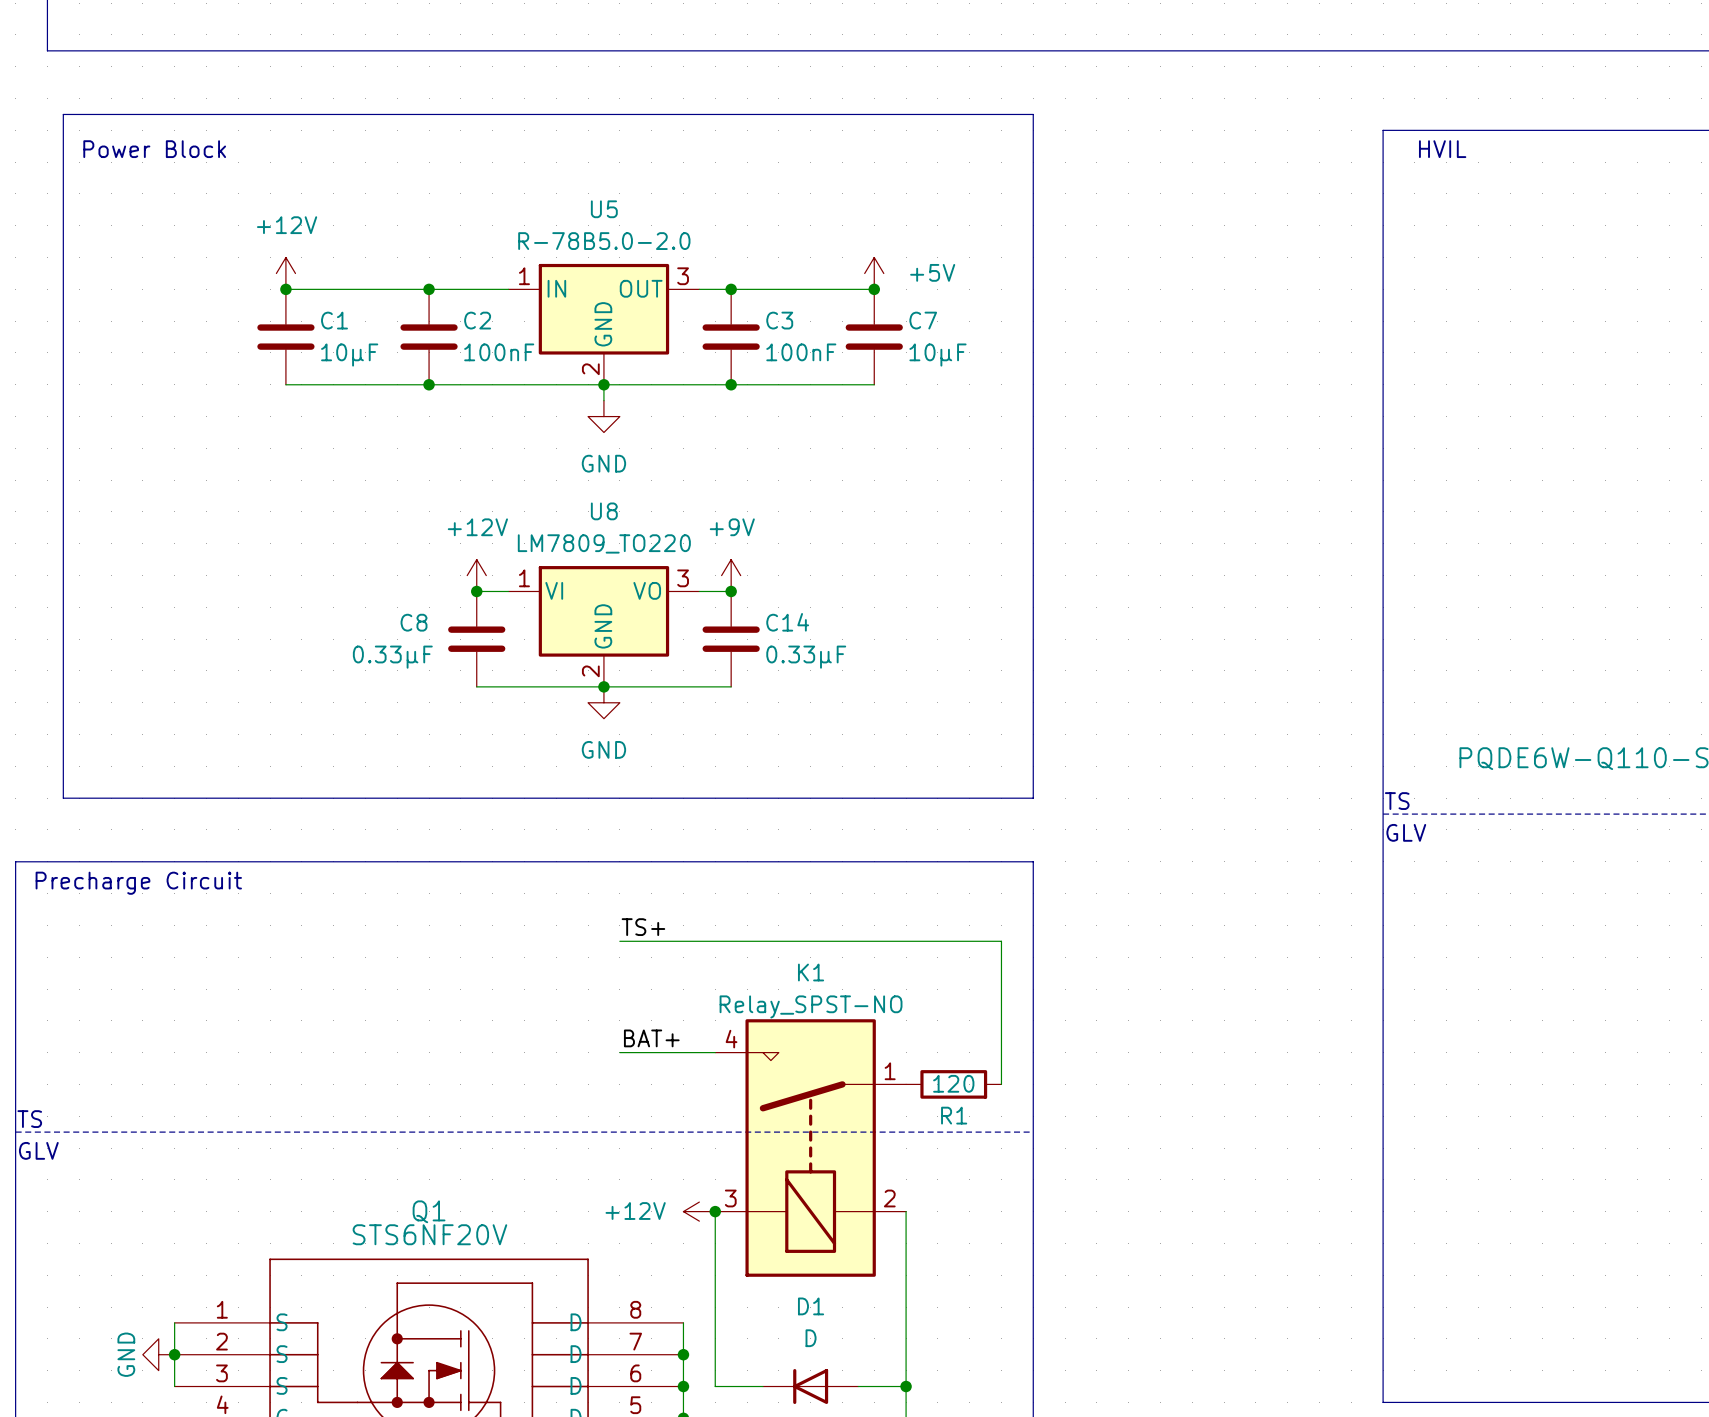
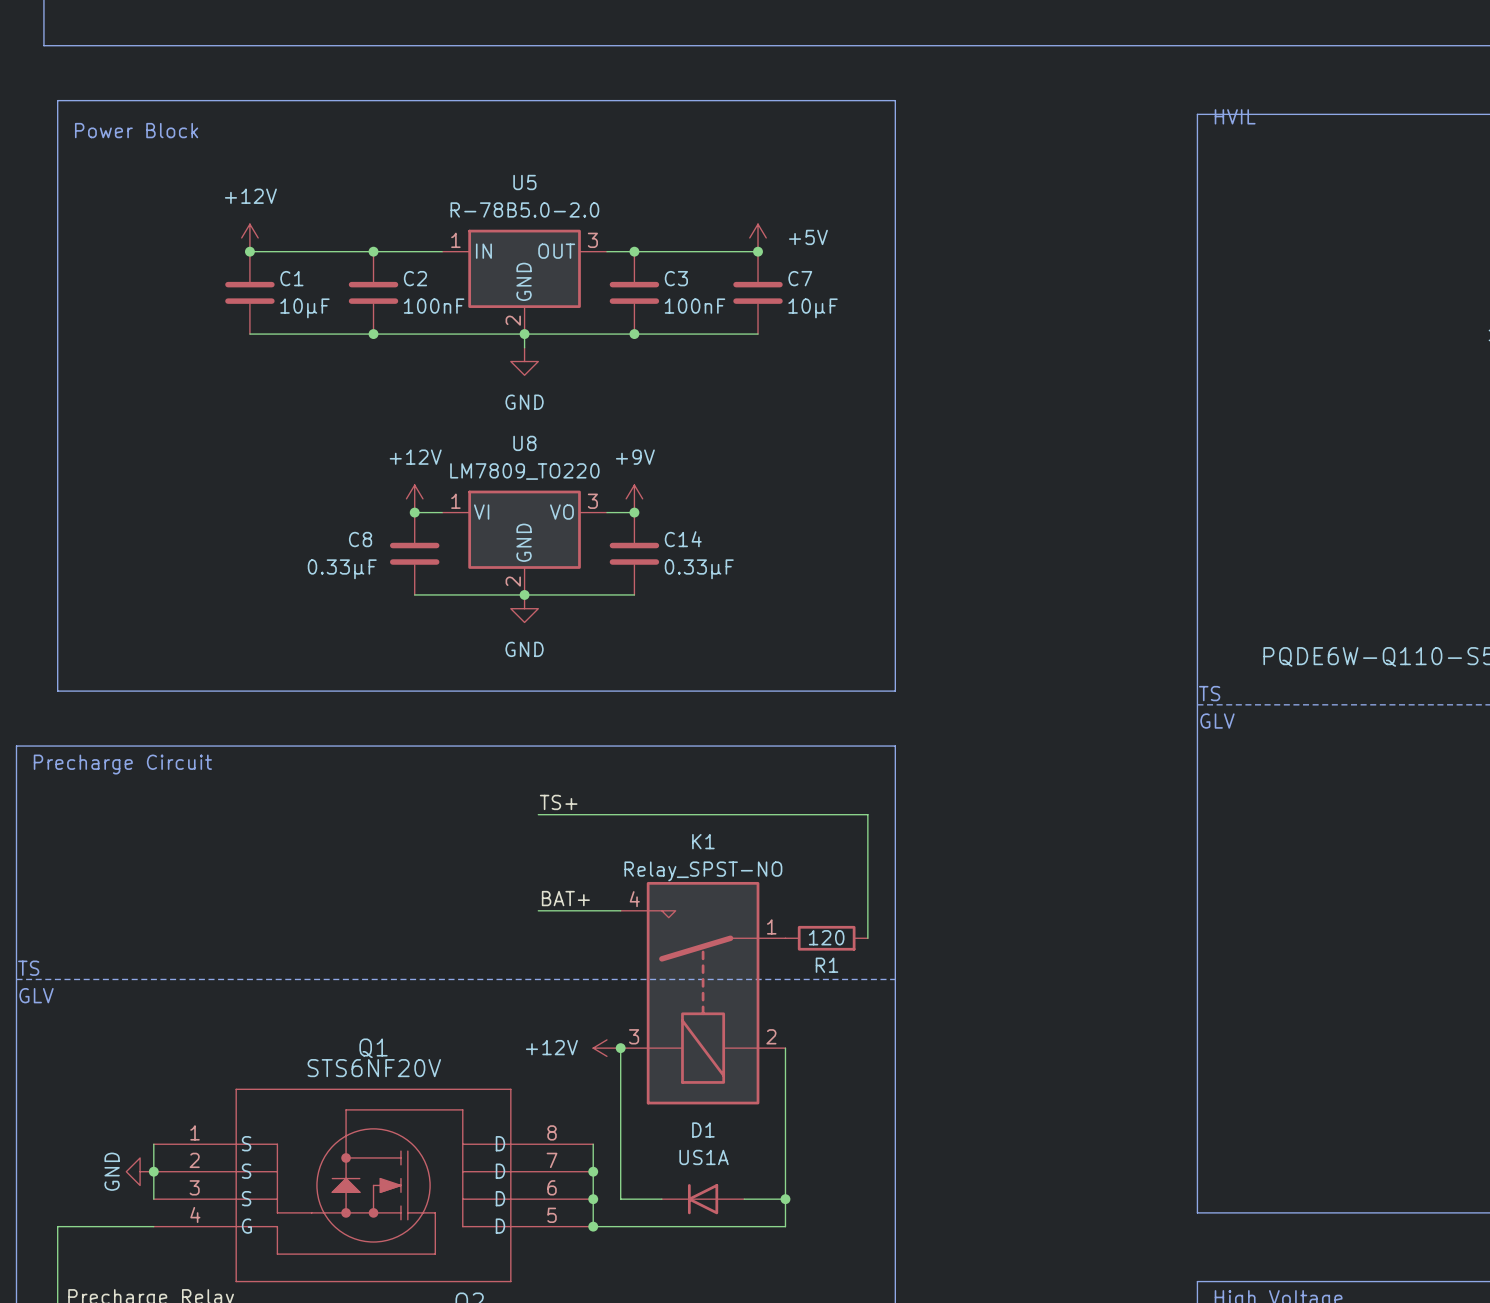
text position: HVIL (1442, 149) -> HVIL (1235, 116)
D1 value: D (811, 1338) -> US1A (704, 1157)

